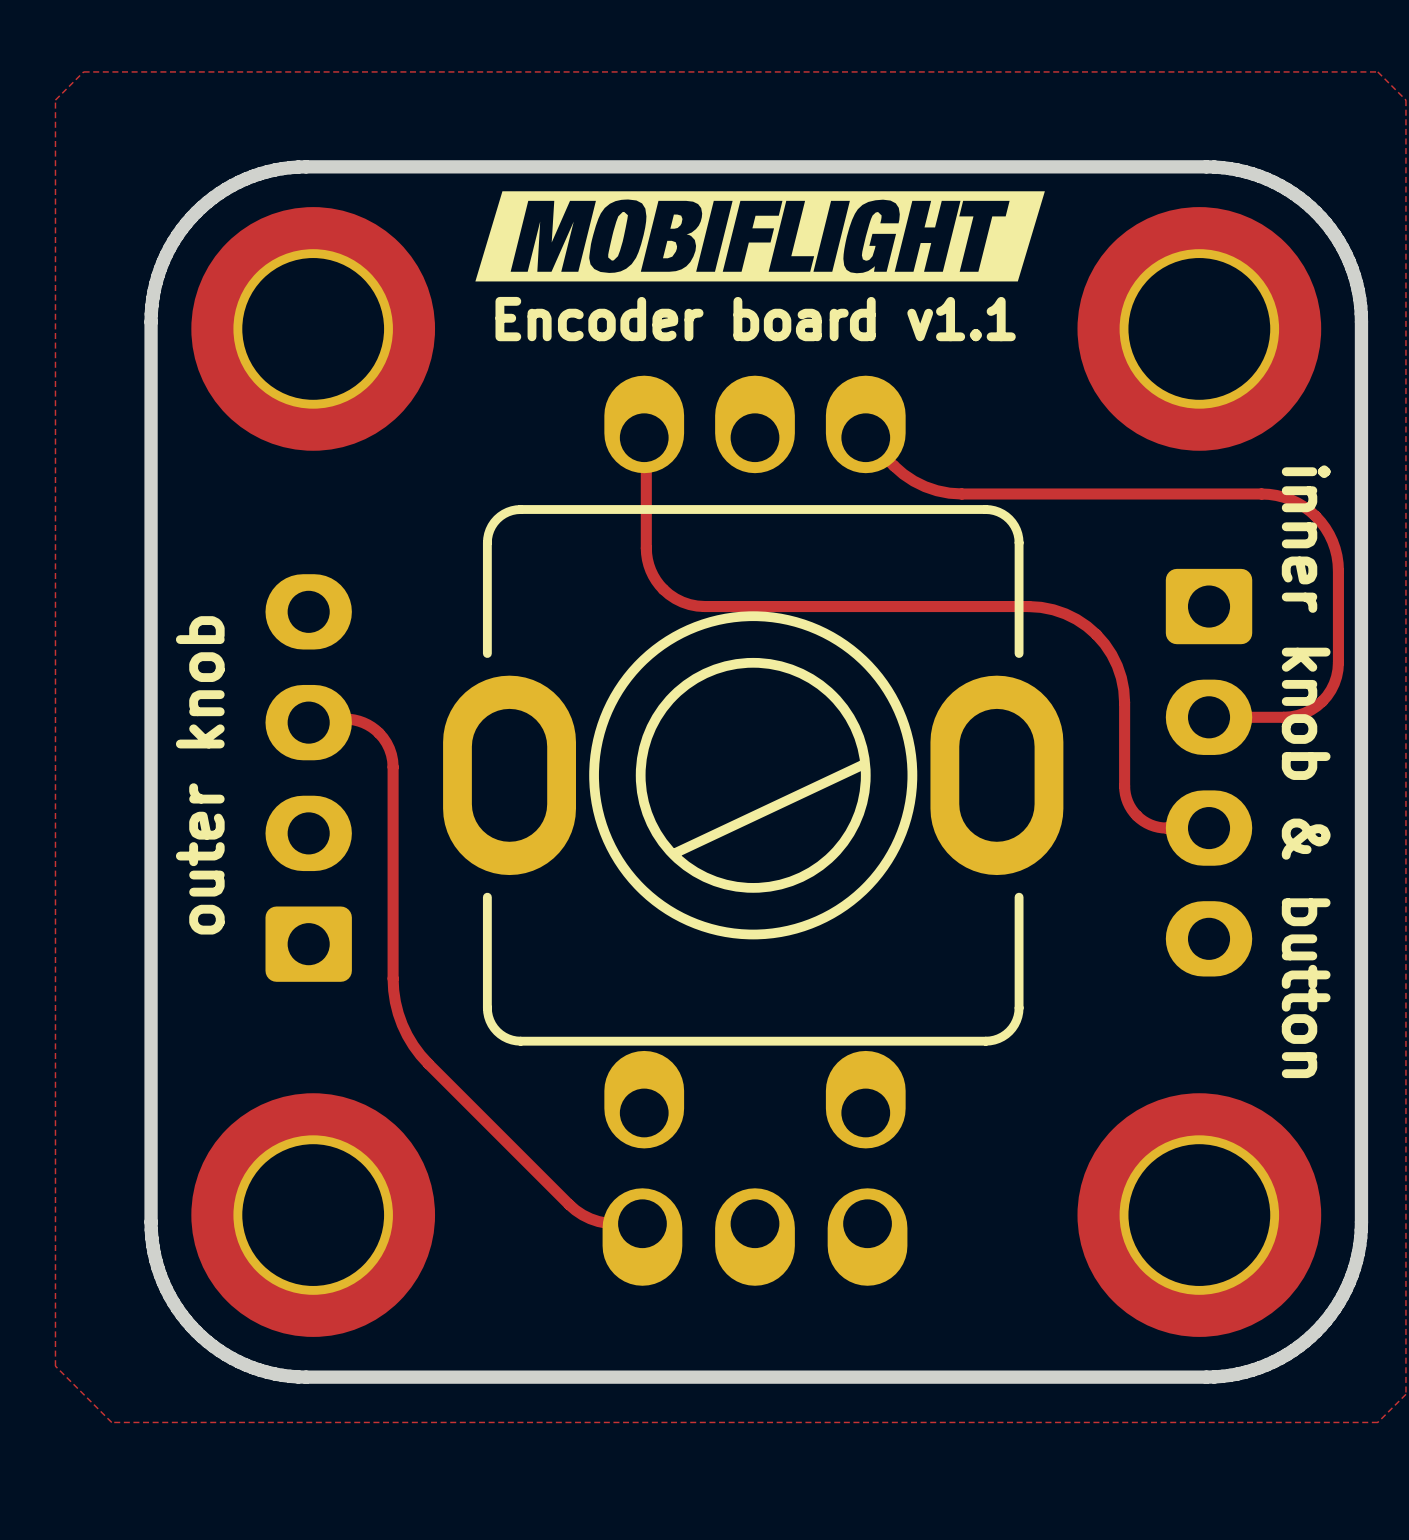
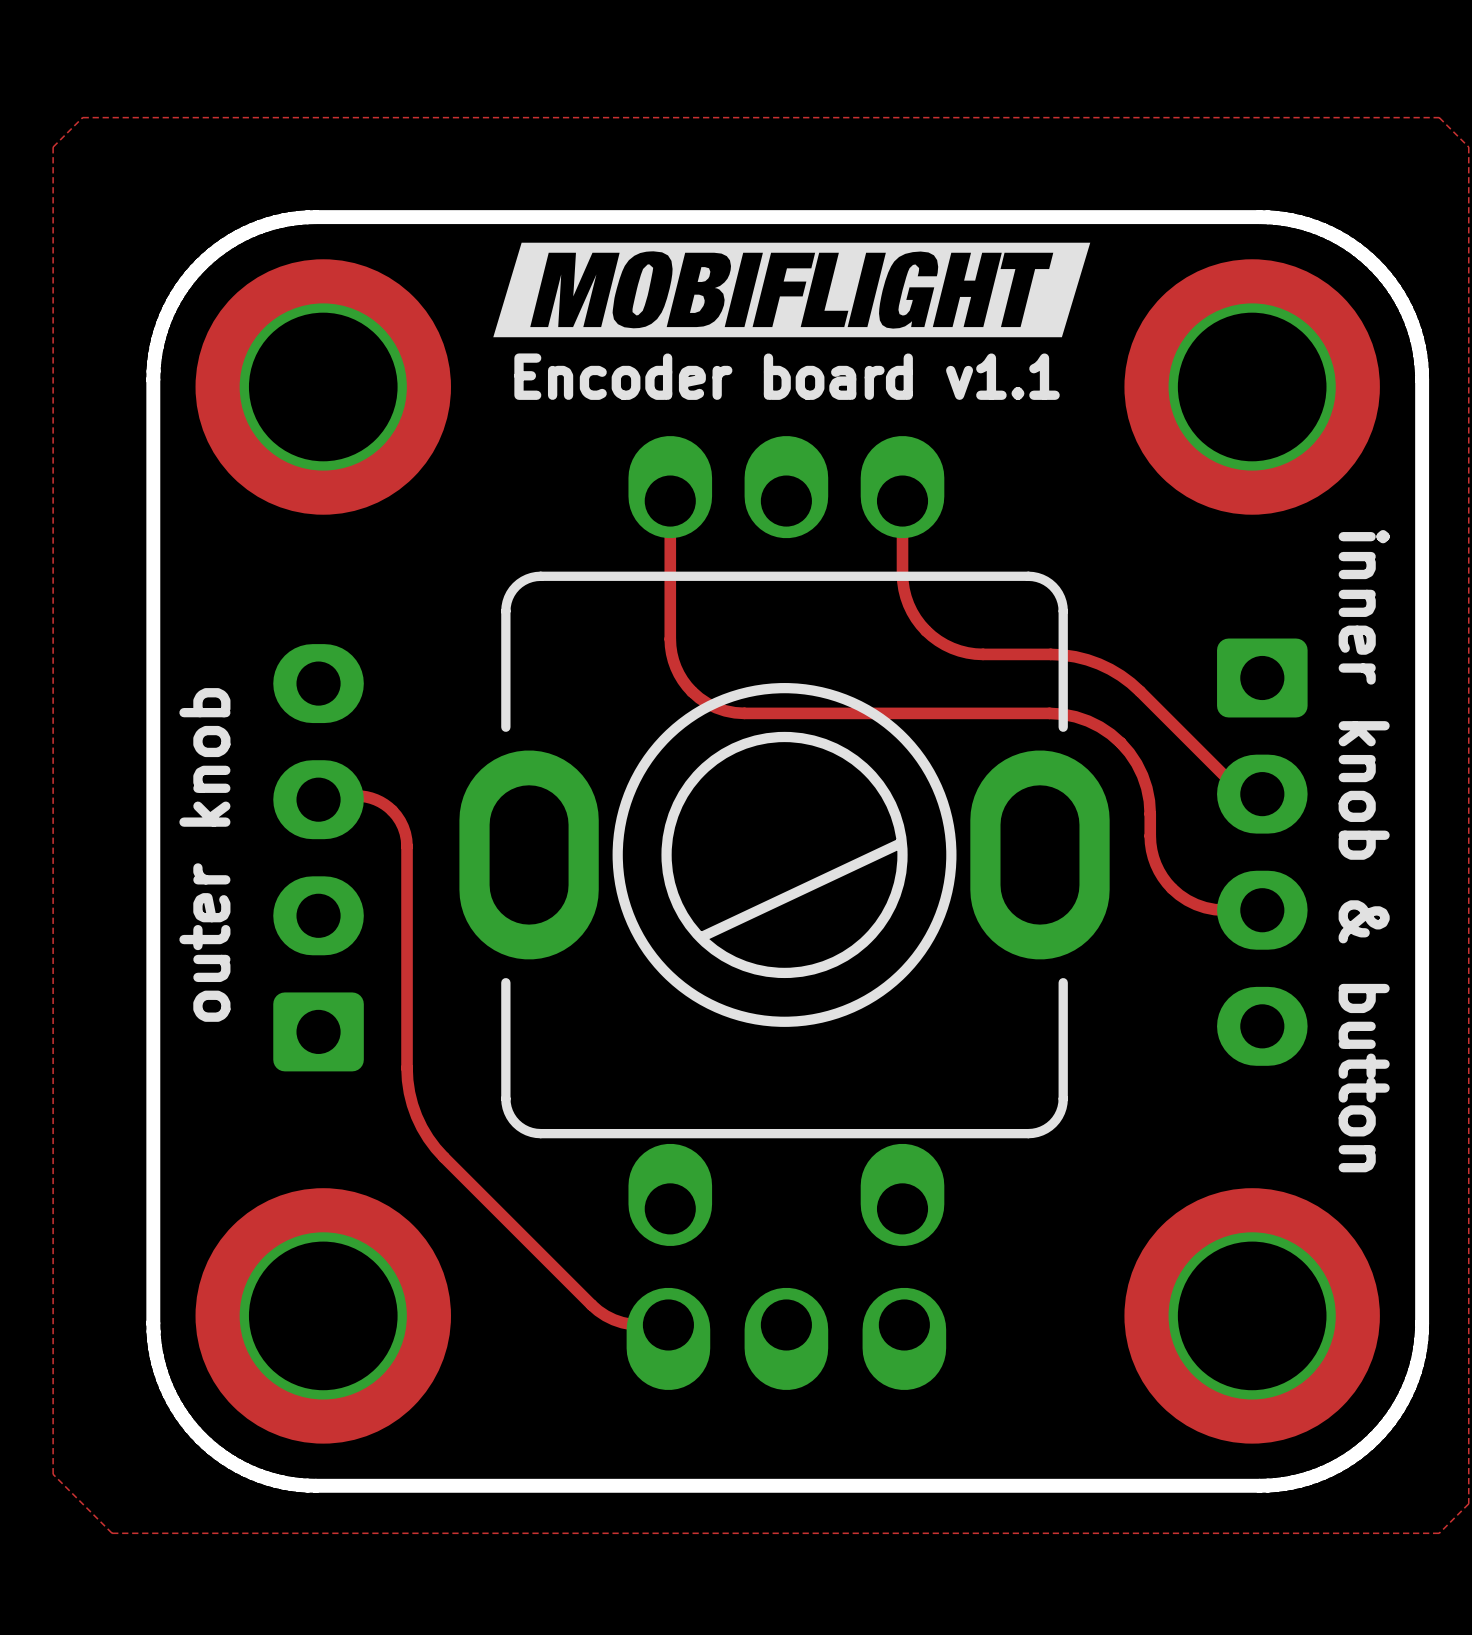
track: (644, 437) (646, 438) (647, 559) (656, 580) (669, 594) (689, 604) (704, 606) (1028, 606) (1041, 607) (1065, 613) (1087, 626) (1096, 634) (1111, 654) (1121, 677) (1124, 702) (1124, 790) (1129, 805) (1136, 815) (1146, 823) (1158, 827) (1172, 828) -> (670, 501) (670, 646) (679, 674) (687, 686) (699, 698) (725, 710) (744, 713) (1049, 713) (1062, 714) (1088, 721) (1099, 726) (1120, 742) (1129, 752) (1142, 775) (1149, 800) (1151, 850) (1162, 877) (1171, 888) (1187, 900) (1205, 907) (1224, 910)
track: (865, 437) (893, 465) (913, 481) (925, 486) (949, 493) (1269, 494) (1291, 499) (1310, 511) (1329, 534) (1338, 563) (1338, 662) (1334, 683) (1322, 701) (1311, 709) (1297, 715) (1283, 717) (1209, 717) -> (902, 501) (904, 589) (912, 611) (920, 624) (931, 636) (945, 644) (967, 652) (1063, 655) (1087, 659) (1110, 669) (1140, 691) (1238, 789) (1246, 793) (1262, 794)

